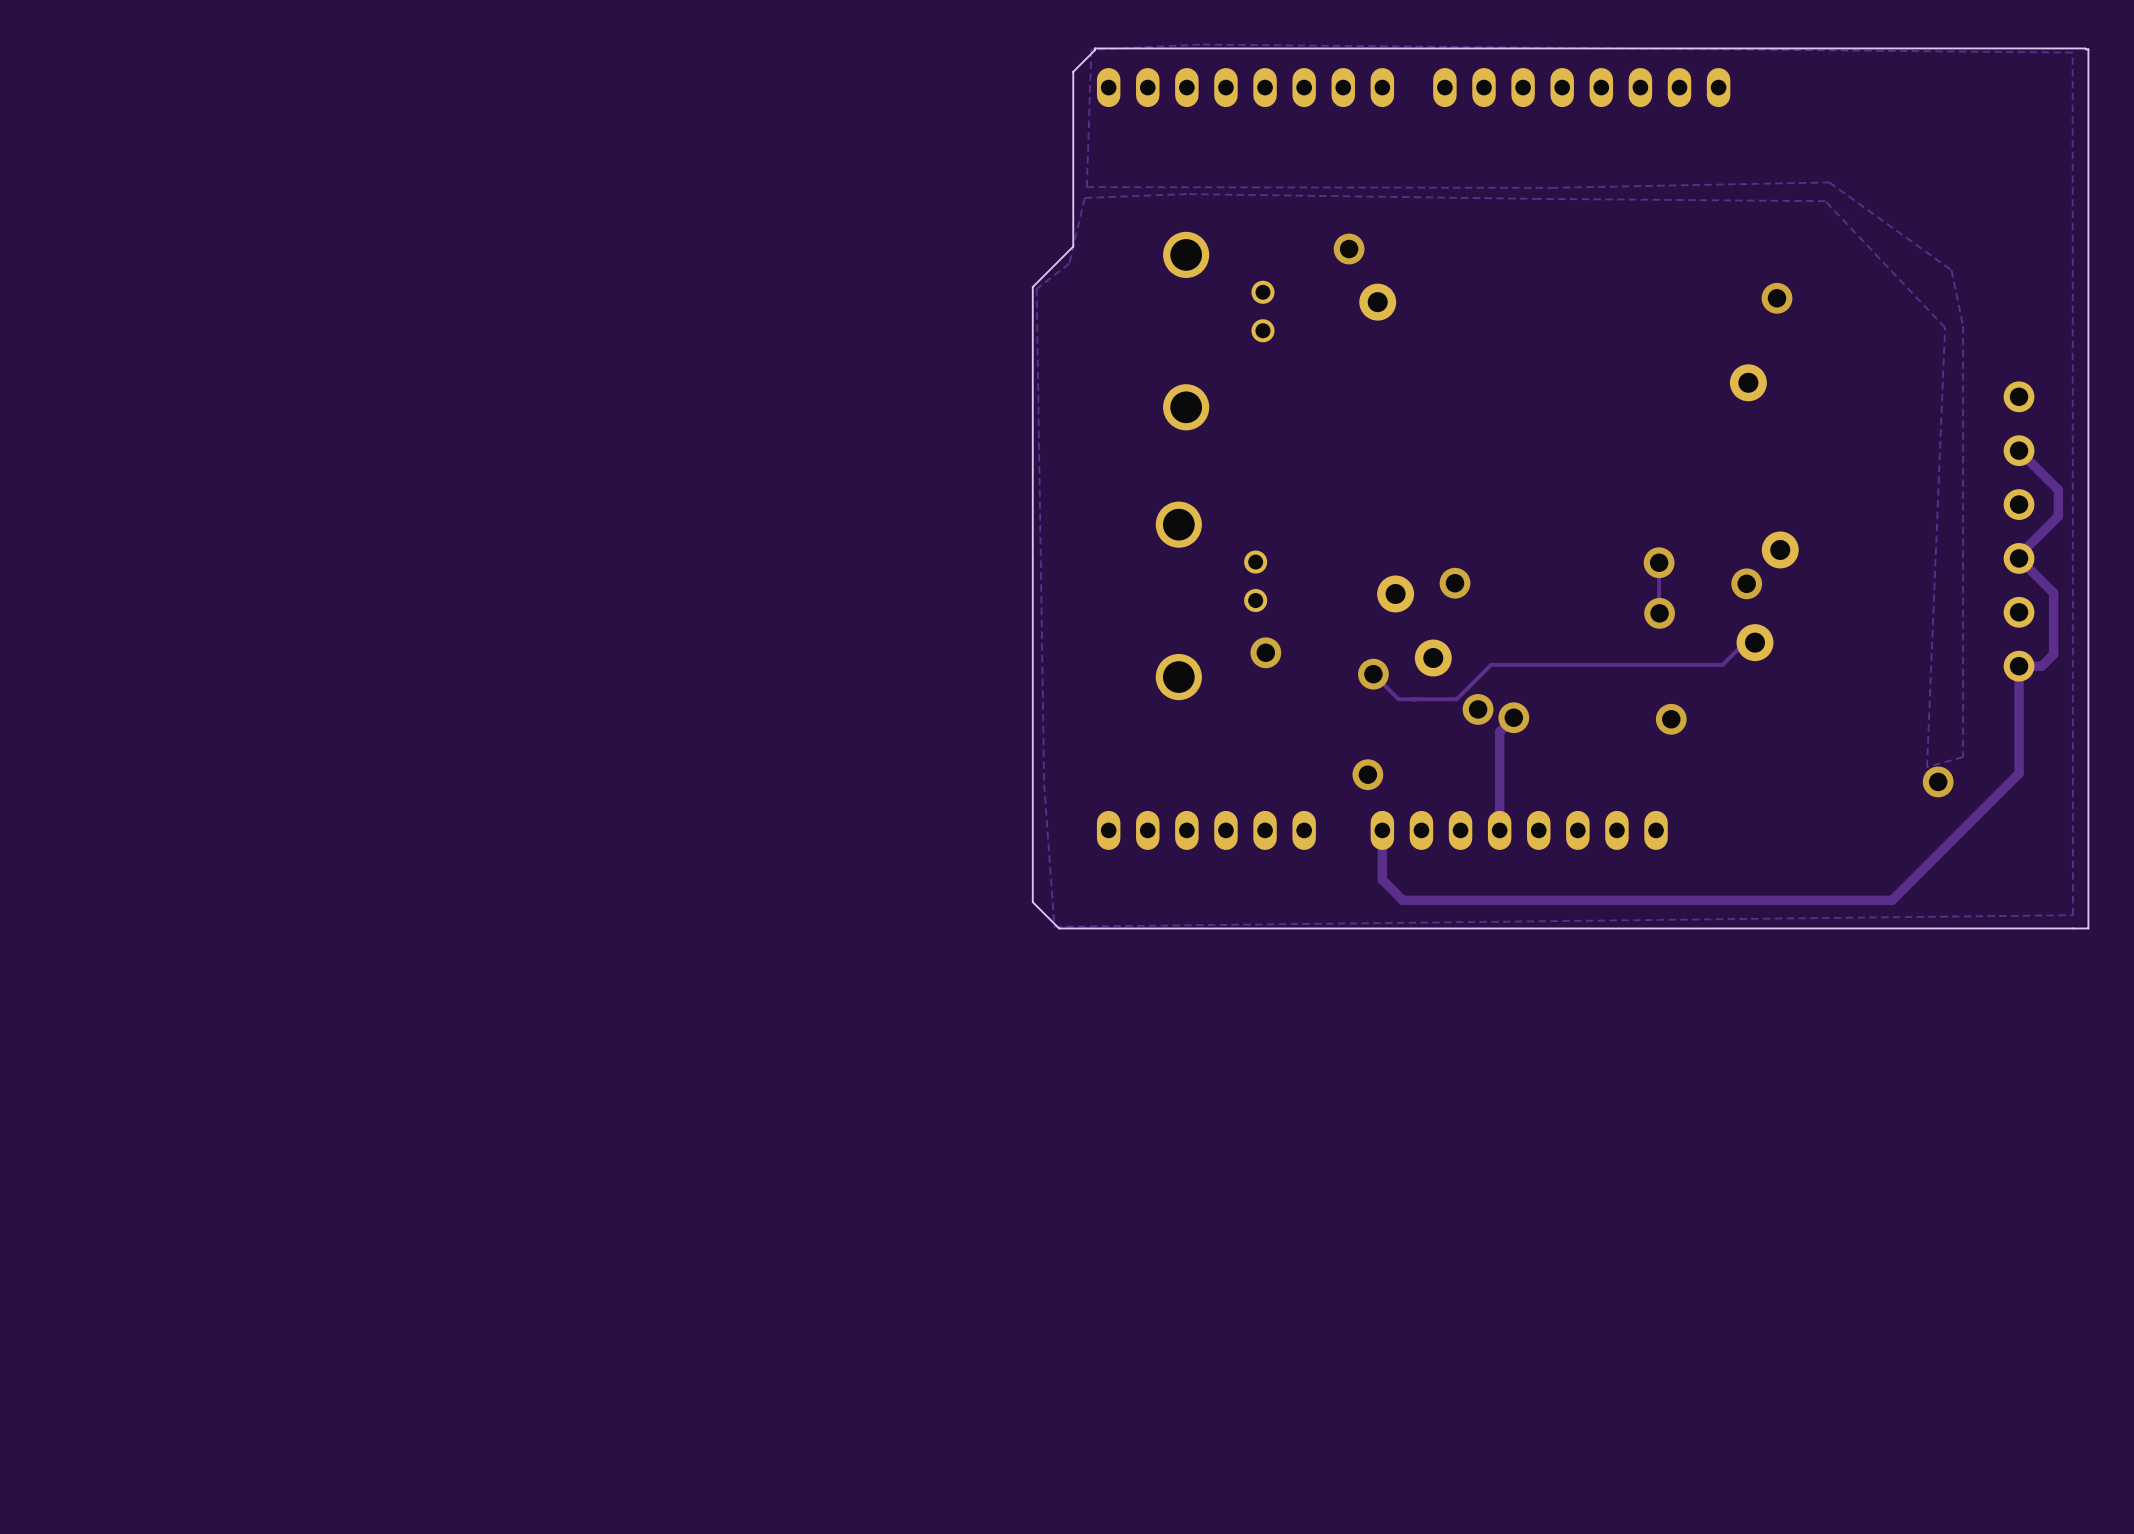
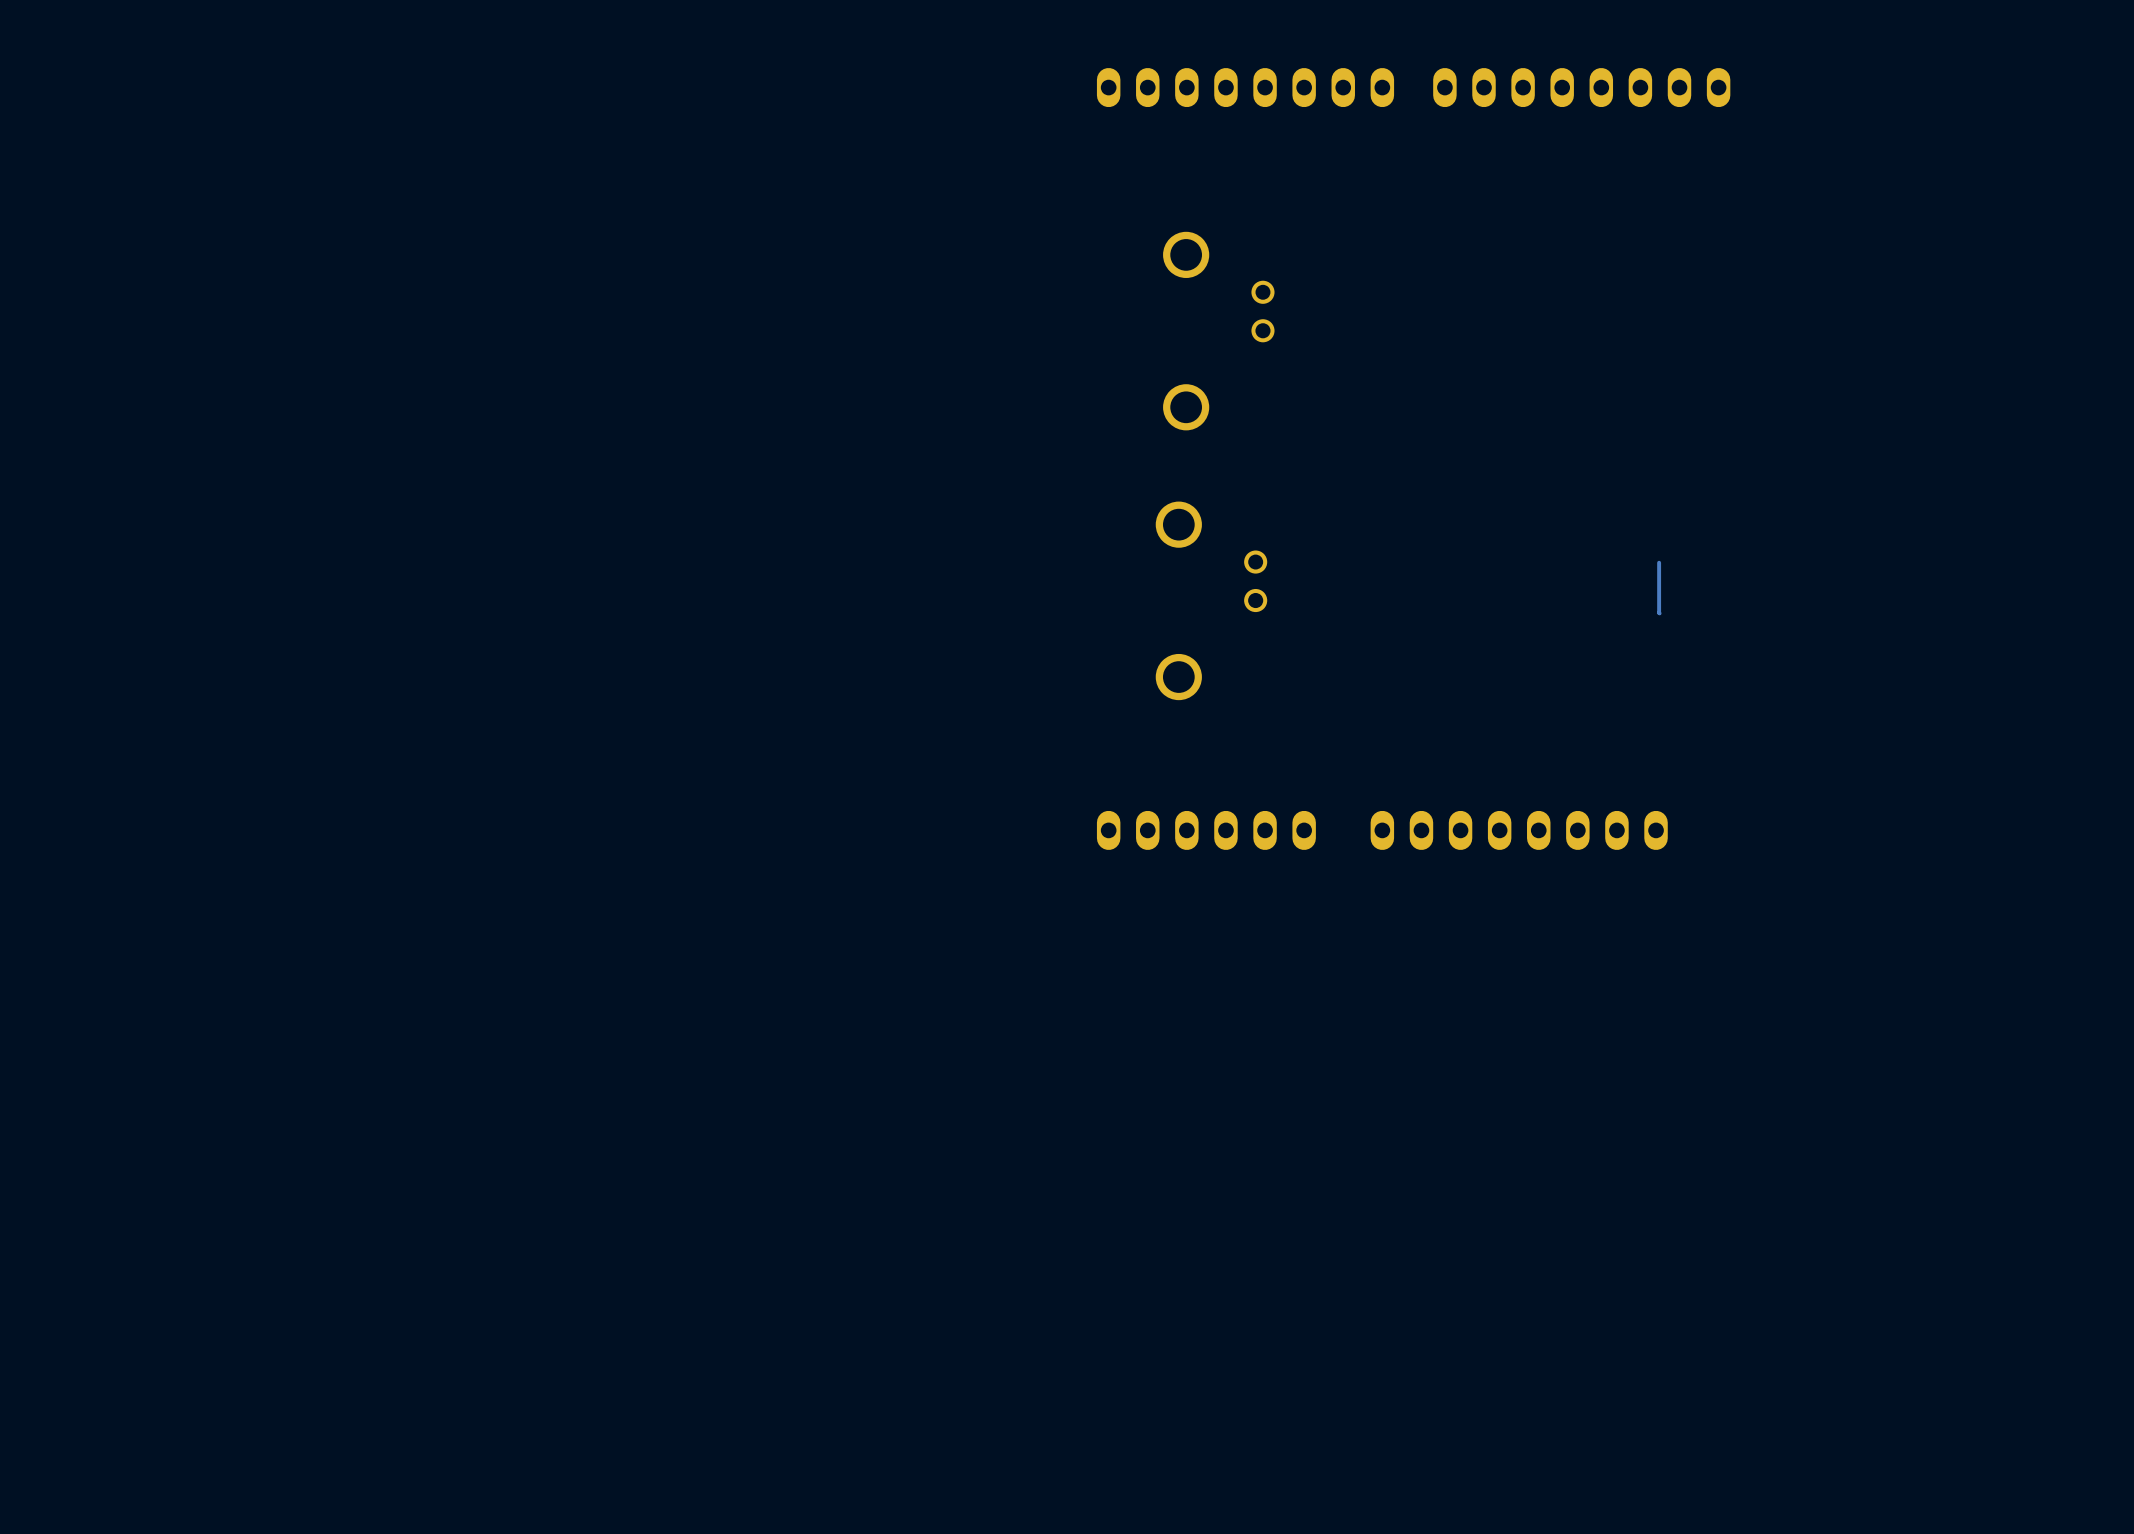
zone outline: (1199, 44) (2072, 52) (2072, 915) (1054, 926) (1044, 784) (1036, 288) (1069, 263) (1084, 197) (1186, 194) (1825, 201) (1945, 327) (1927, 767) (1963, 757) (1963, 326) (1951, 270) (1829, 182) (1550, 187) (1086, 187) (1091, 49) (1199, 44) -> none
board edge: (2085, 48) (1094, 48) (1073, 71) (1073, 246) (1032, 287) (1032, 902) (1059, 928) (2088, 928) (2088, 49) (2085, 49) -> none
via: (1349, 249) -> none
via: (1777, 298) -> none
part: (1377, 302) -> none
part: (1748, 382) -> none
track: (2019, 450) (2058, 490) (2058, 516) (2019, 555) (2019, 558) (2053, 593) (2053, 654) (2041, 666) (2019, 666) (2019, 773) (1892, 900) (1402, 900) (1382, 879) (1382, 830) -> none
part: (2019, 531) -> none
part: (1780, 549) -> none
via: (1659, 562) -> none
via: (1455, 583) -> none
via: (1746, 583) -> none
part: (1395, 593) -> none
via: (1659, 613) -> none
track: (1755, 642) (1744, 642) (1722, 664) (1491, 664) (1456, 699) (1398, 699) (1373, 674) -> none
part: (1755, 642) -> none
via: (1265, 652) -> none
part: (1433, 658) -> none
via: (1373, 674) -> none
via: (1478, 709) -> none
track: (1513, 717) (1499, 731) (1499, 830) -> none
via: (1513, 717) -> none
via: (1671, 719) -> none
via: (1367, 774) -> none
via: (1938, 781) -> none

